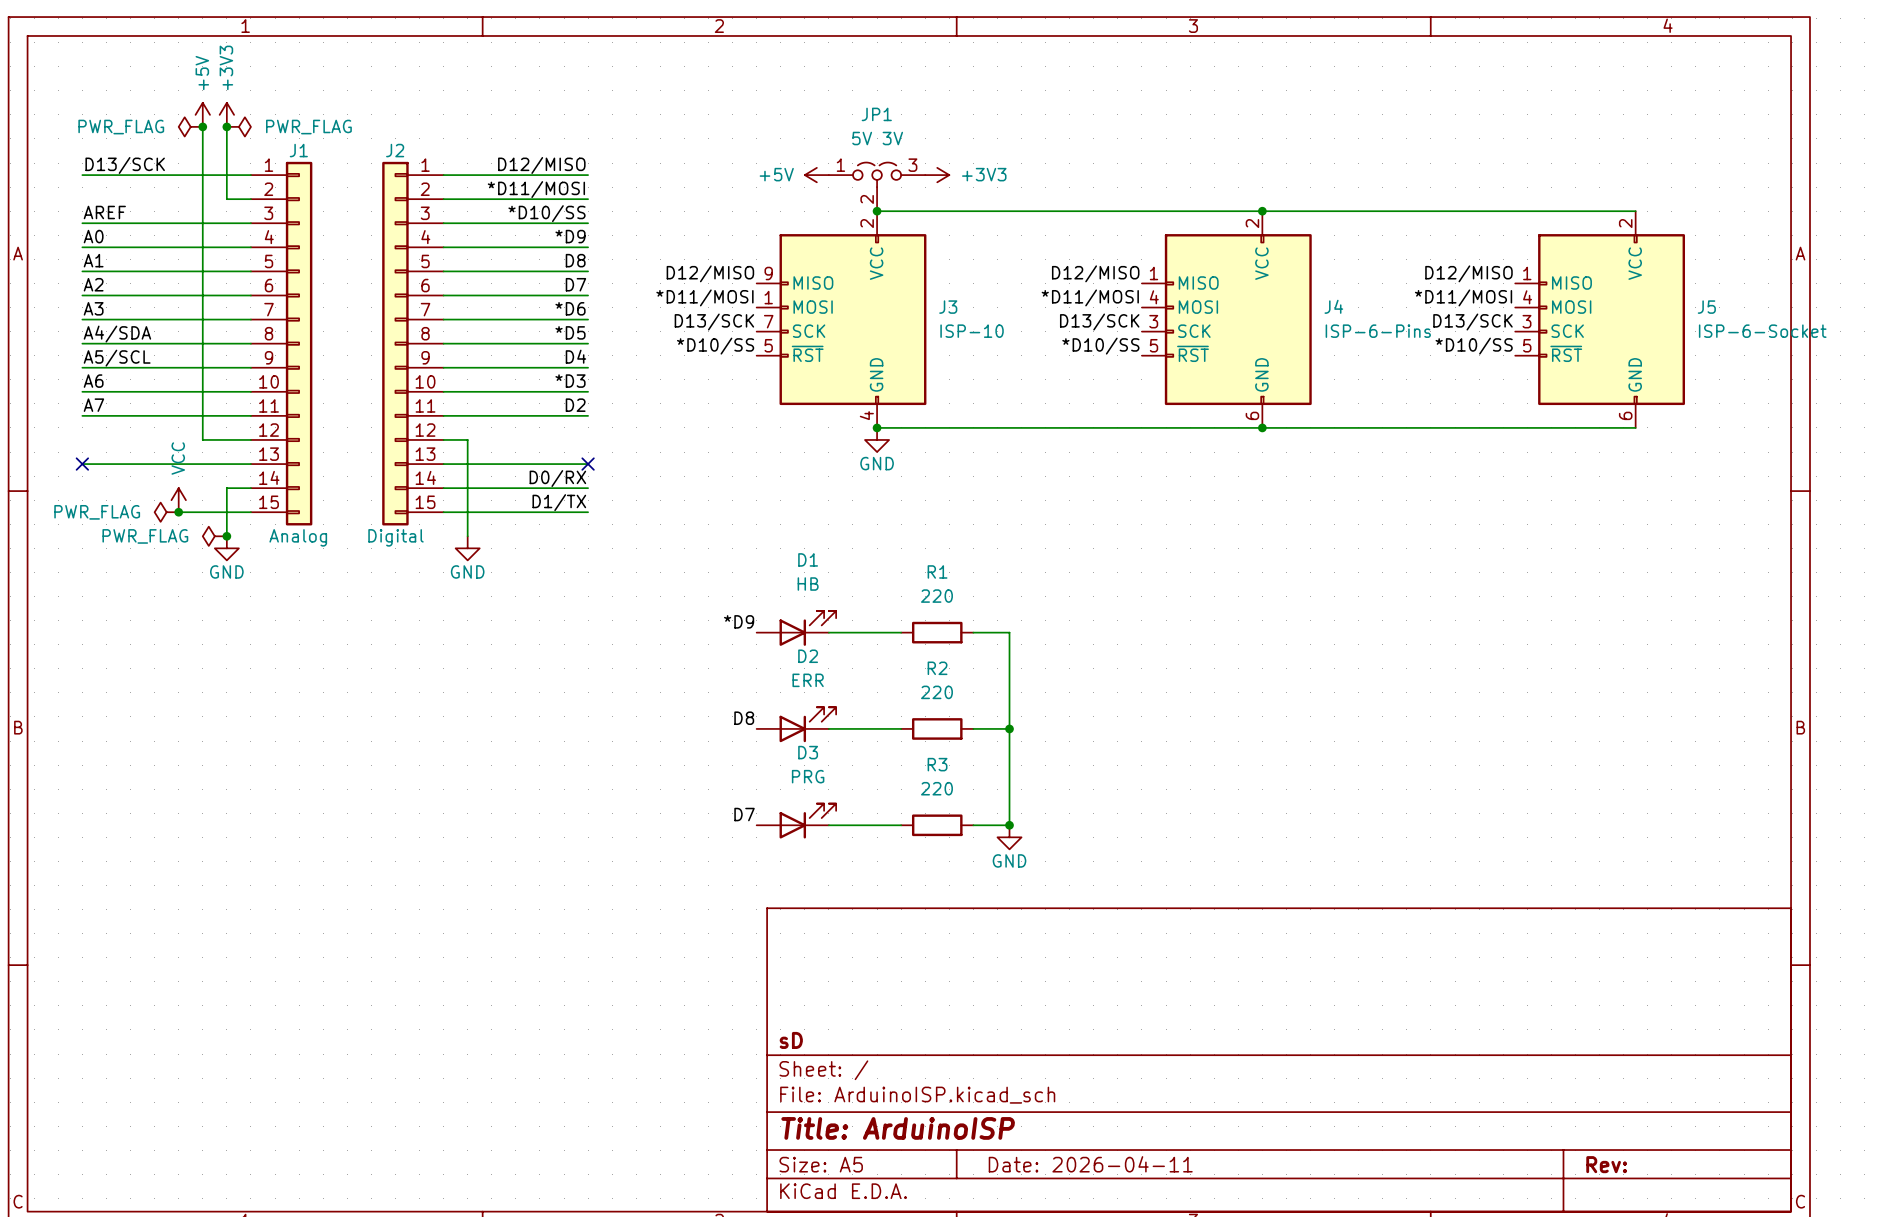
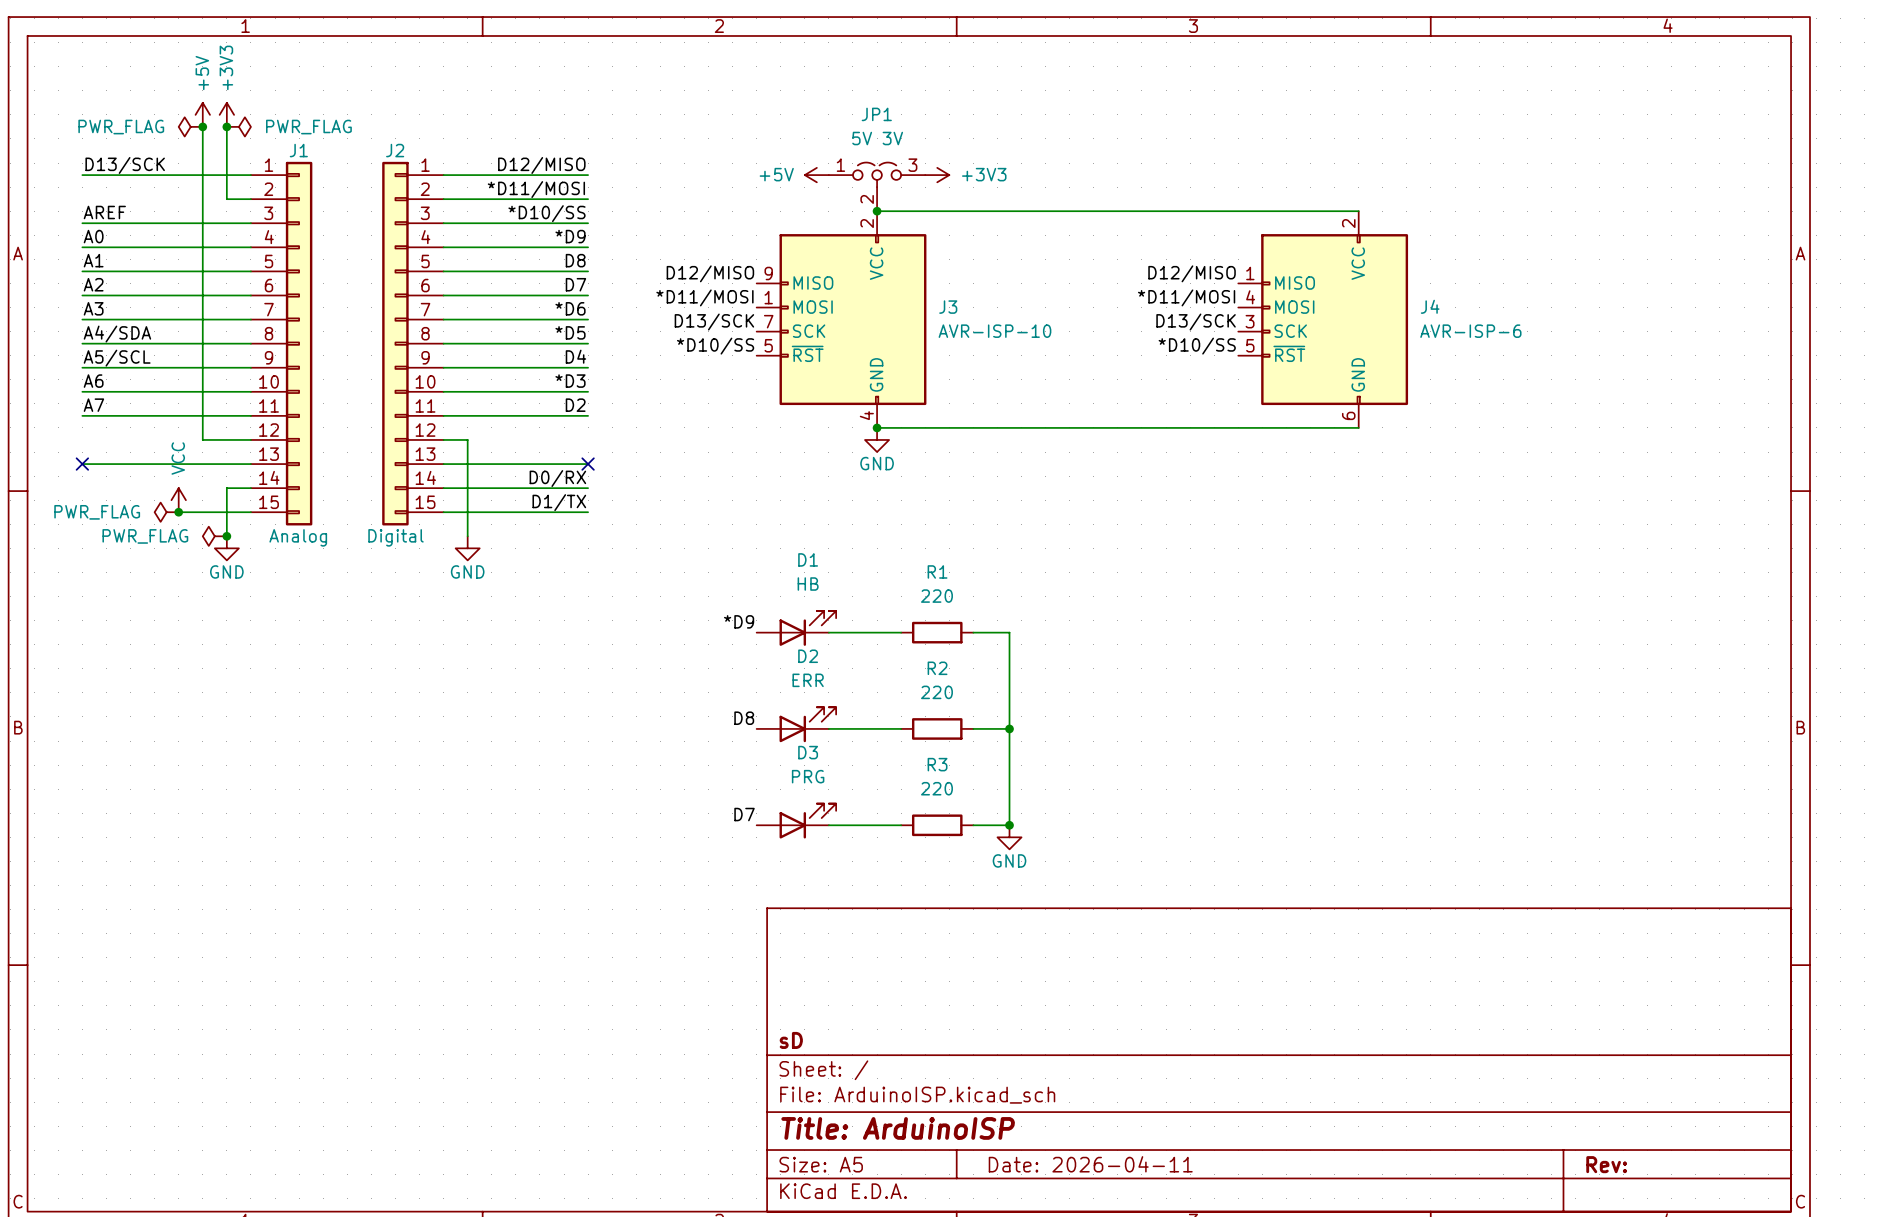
junction: (1262, 211) -> none
wire: (1358, 211) (1635, 211) -> none
label position: D12/MISO (1095, 273) -> D12/MISO (1192, 273)
label: D12/MISO (1468, 273) -> none
label position: *D11/MOSI (1090, 297) -> *D11/MOSI (1186, 297)
label: *D11/MOSI (1463, 297) -> none
J4 position: (1226, 319) -> (1323, 319)
J5: ISP-6-Socket (1600, 319) -> none
label position: D13/SCK (1099, 322) -> D13/SCK (1196, 322)
label: D13/SCK (1472, 322) -> none
J3 value: ISP-10 (972, 331) -> AVR-ISP-10 (994, 331)
J4 value: ISP-6-Pins (1378, 331) -> AVR-ISP-6 (1470, 331)
label position: *D10/SS (1100, 346) -> *D10/SS (1197, 346)
label: *D10/SS (1474, 346) -> none
junction: (1262, 427) -> none
wire: (1358, 427) (1635, 427) -> none

